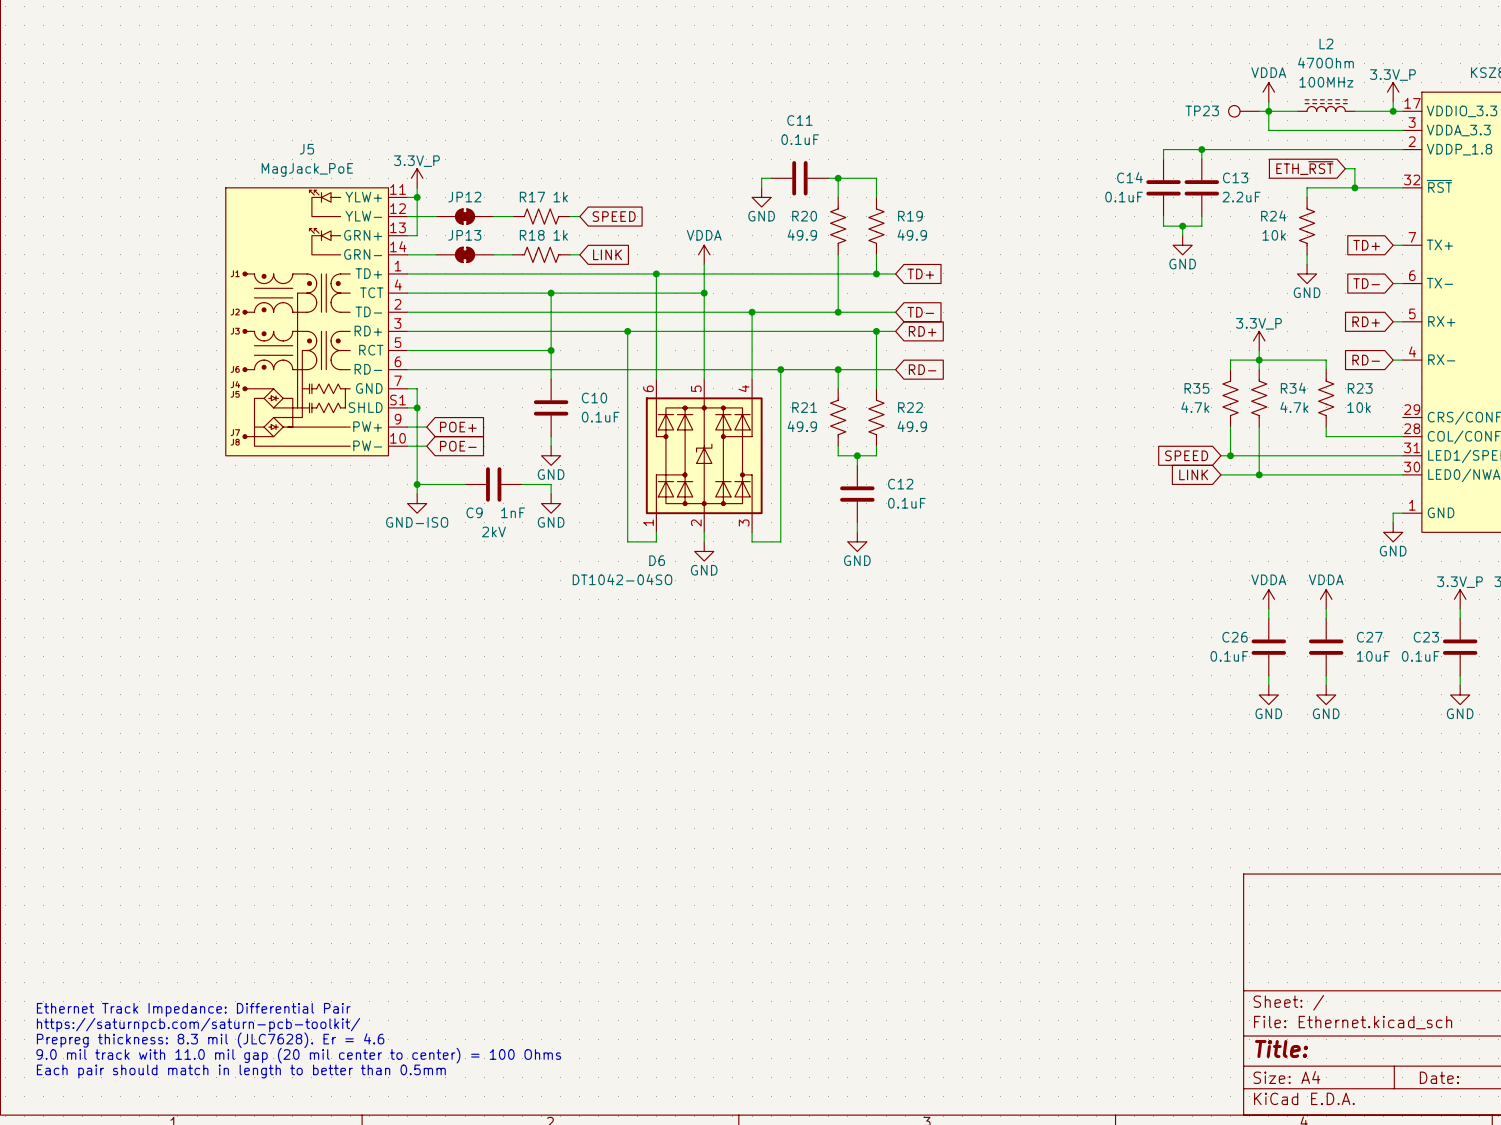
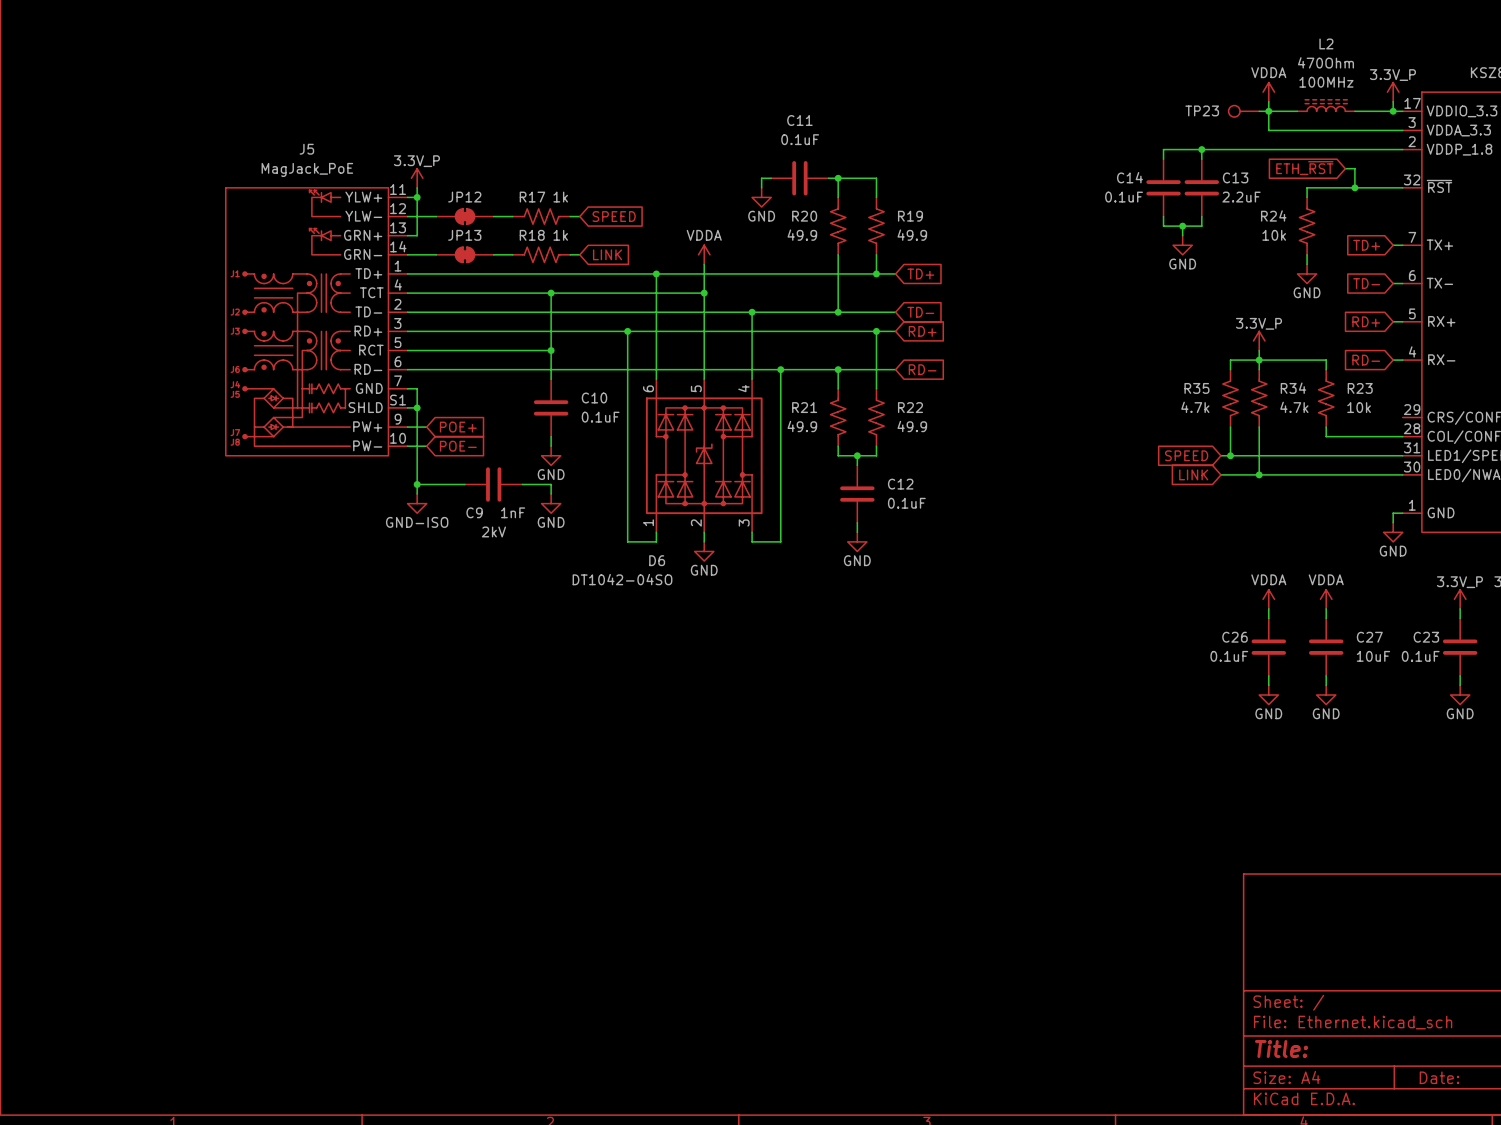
text: Ethernet Track Impedance: Differential Pair (193, 1009) -> none
text: https://saturnpcb.com/saturn-pcb-toolkit/ (198, 1025) -> none
text: Prepreg thickness: 8.3 mil (JLC7628). Er = 4.6 (210, 1040) -> none
text: 9.0 mil track with 11.0 mil gap (20 mil center to center) = 100 Ohms (298, 1055) -> none
text: Each pair should match in length to better than 0.5mm (241, 1071) -> none

